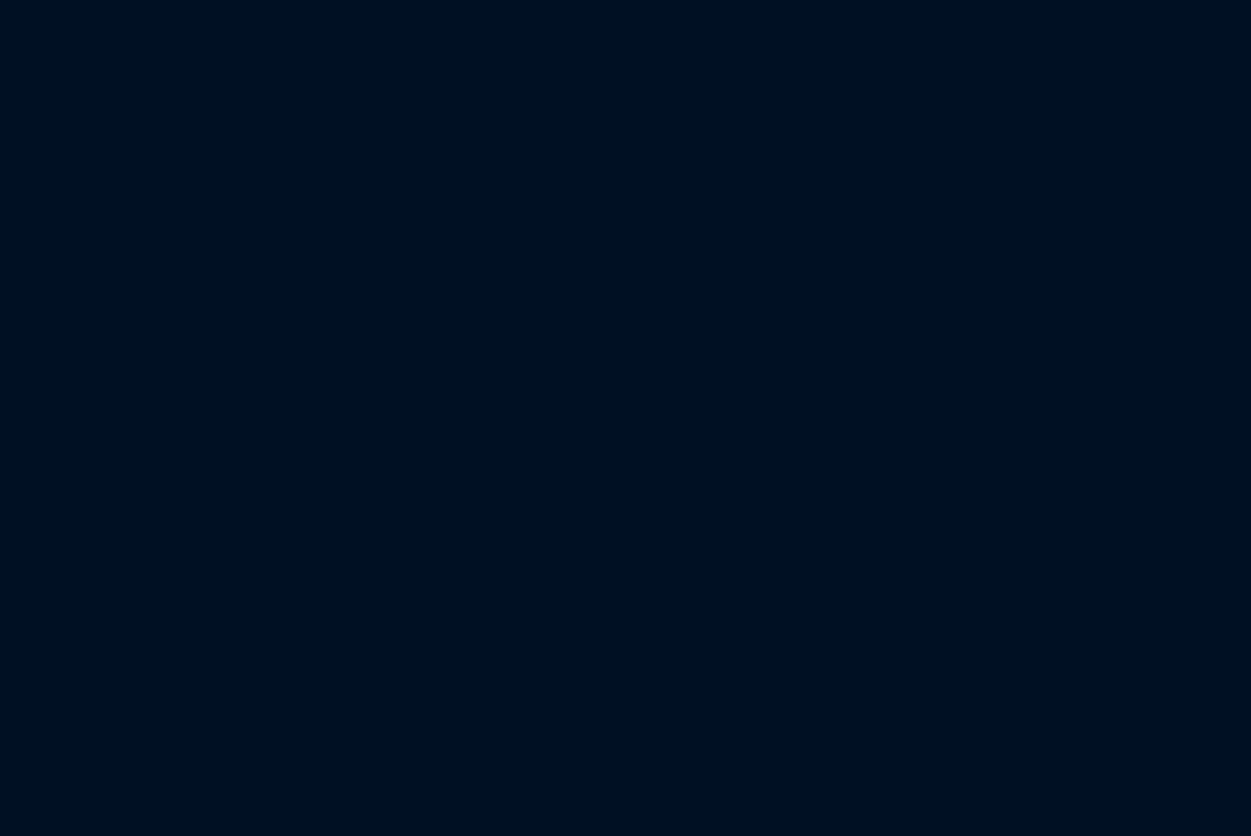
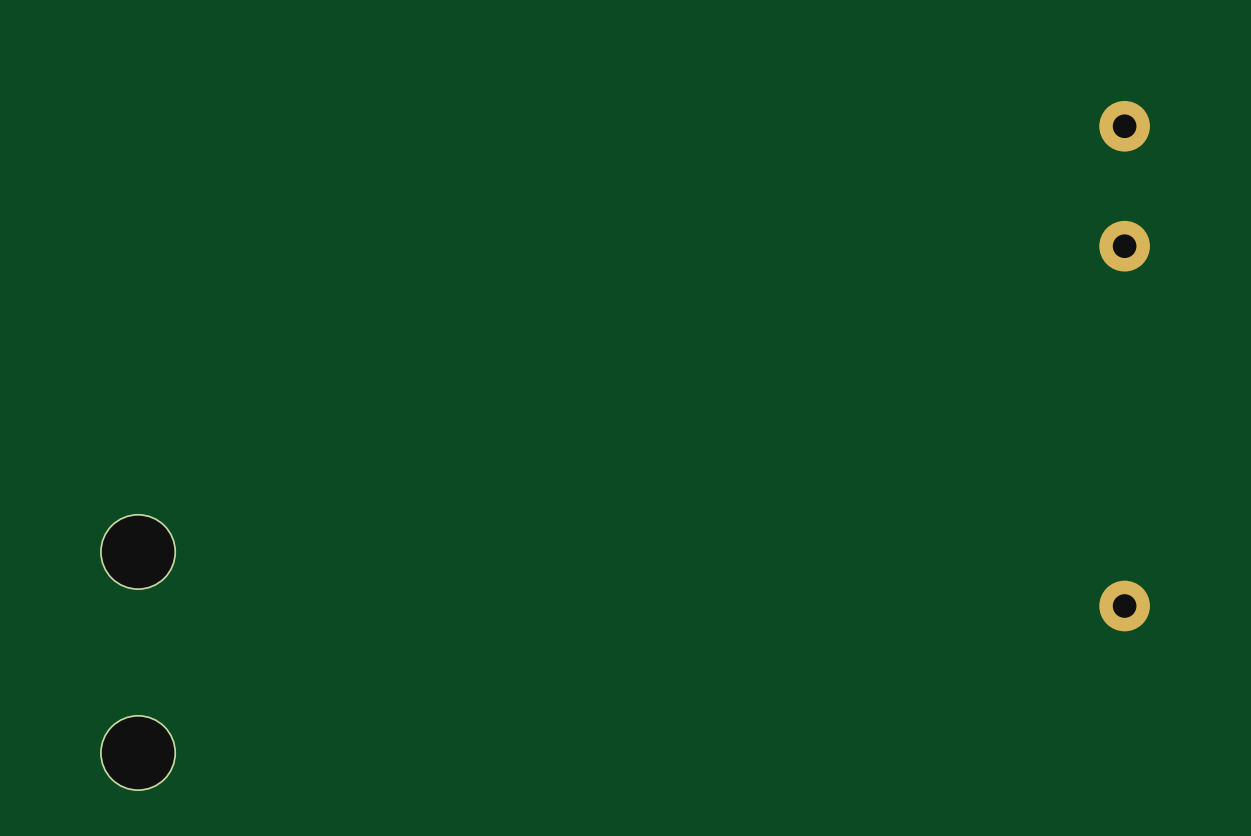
part: none -> (1124, 126)
part: none -> (1124, 246)
part: none -> (138, 551)
part: none -> (1124, 606)
part: none -> (138, 752)

